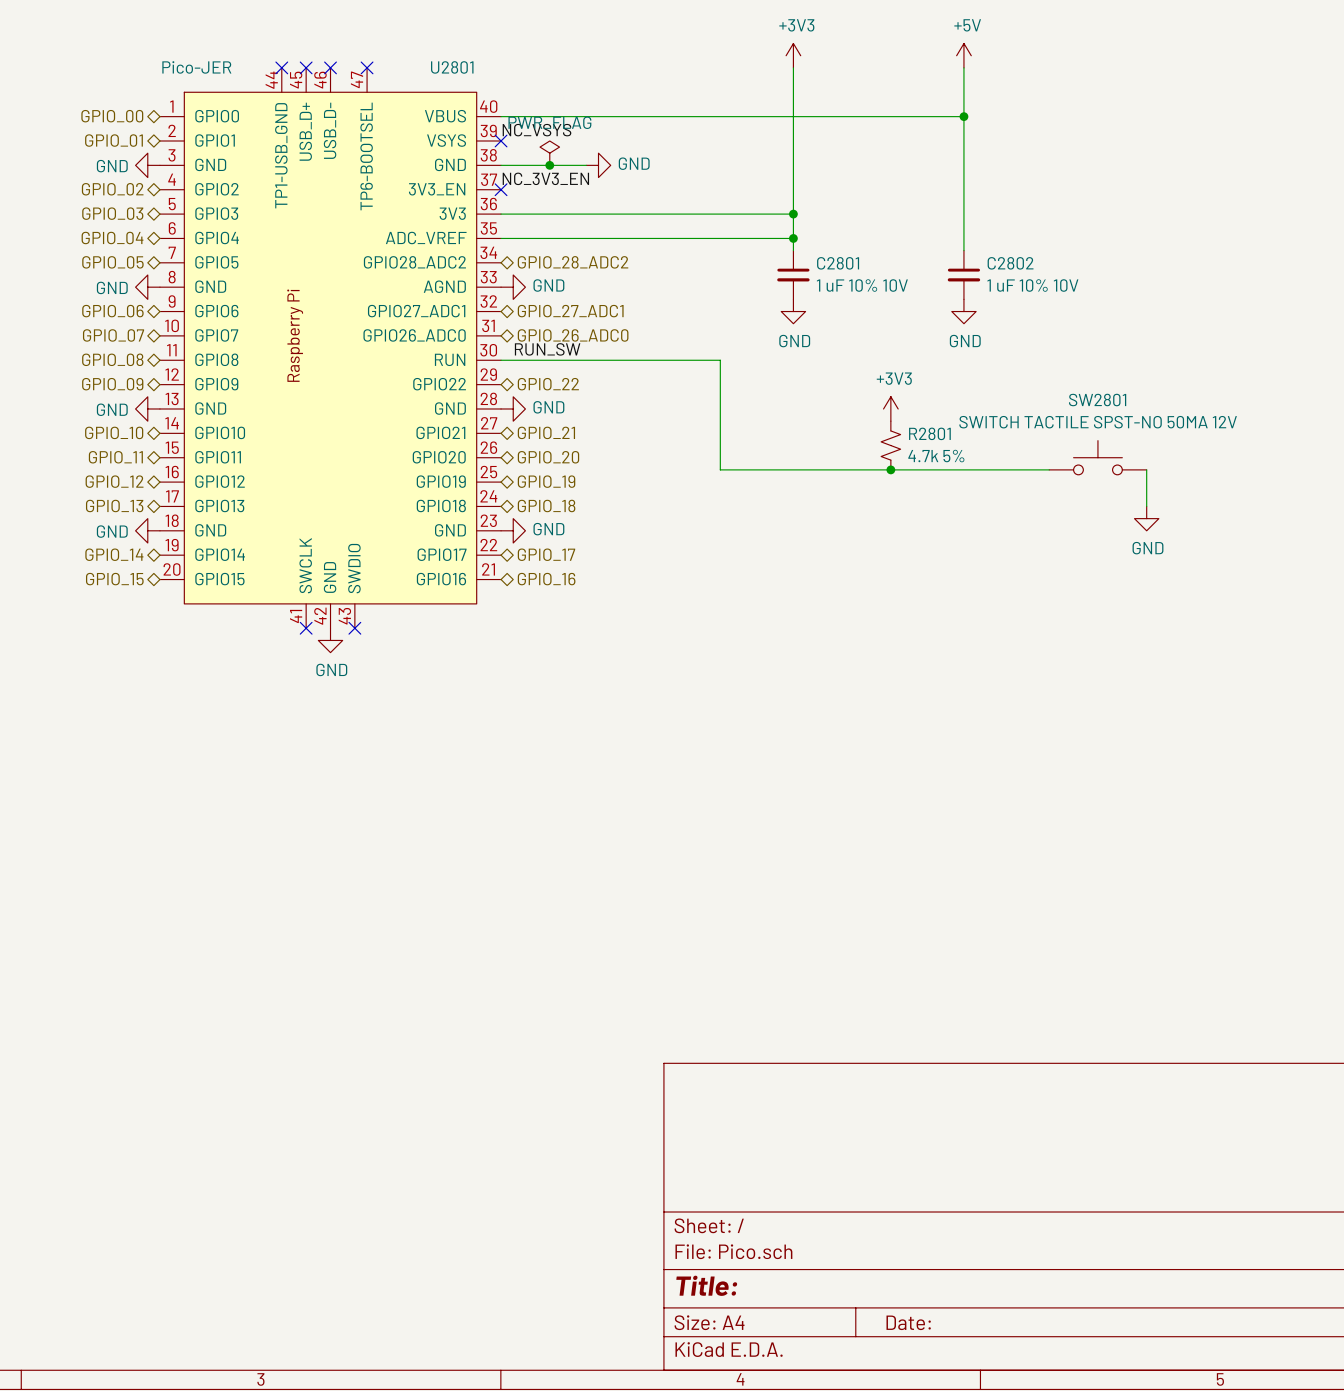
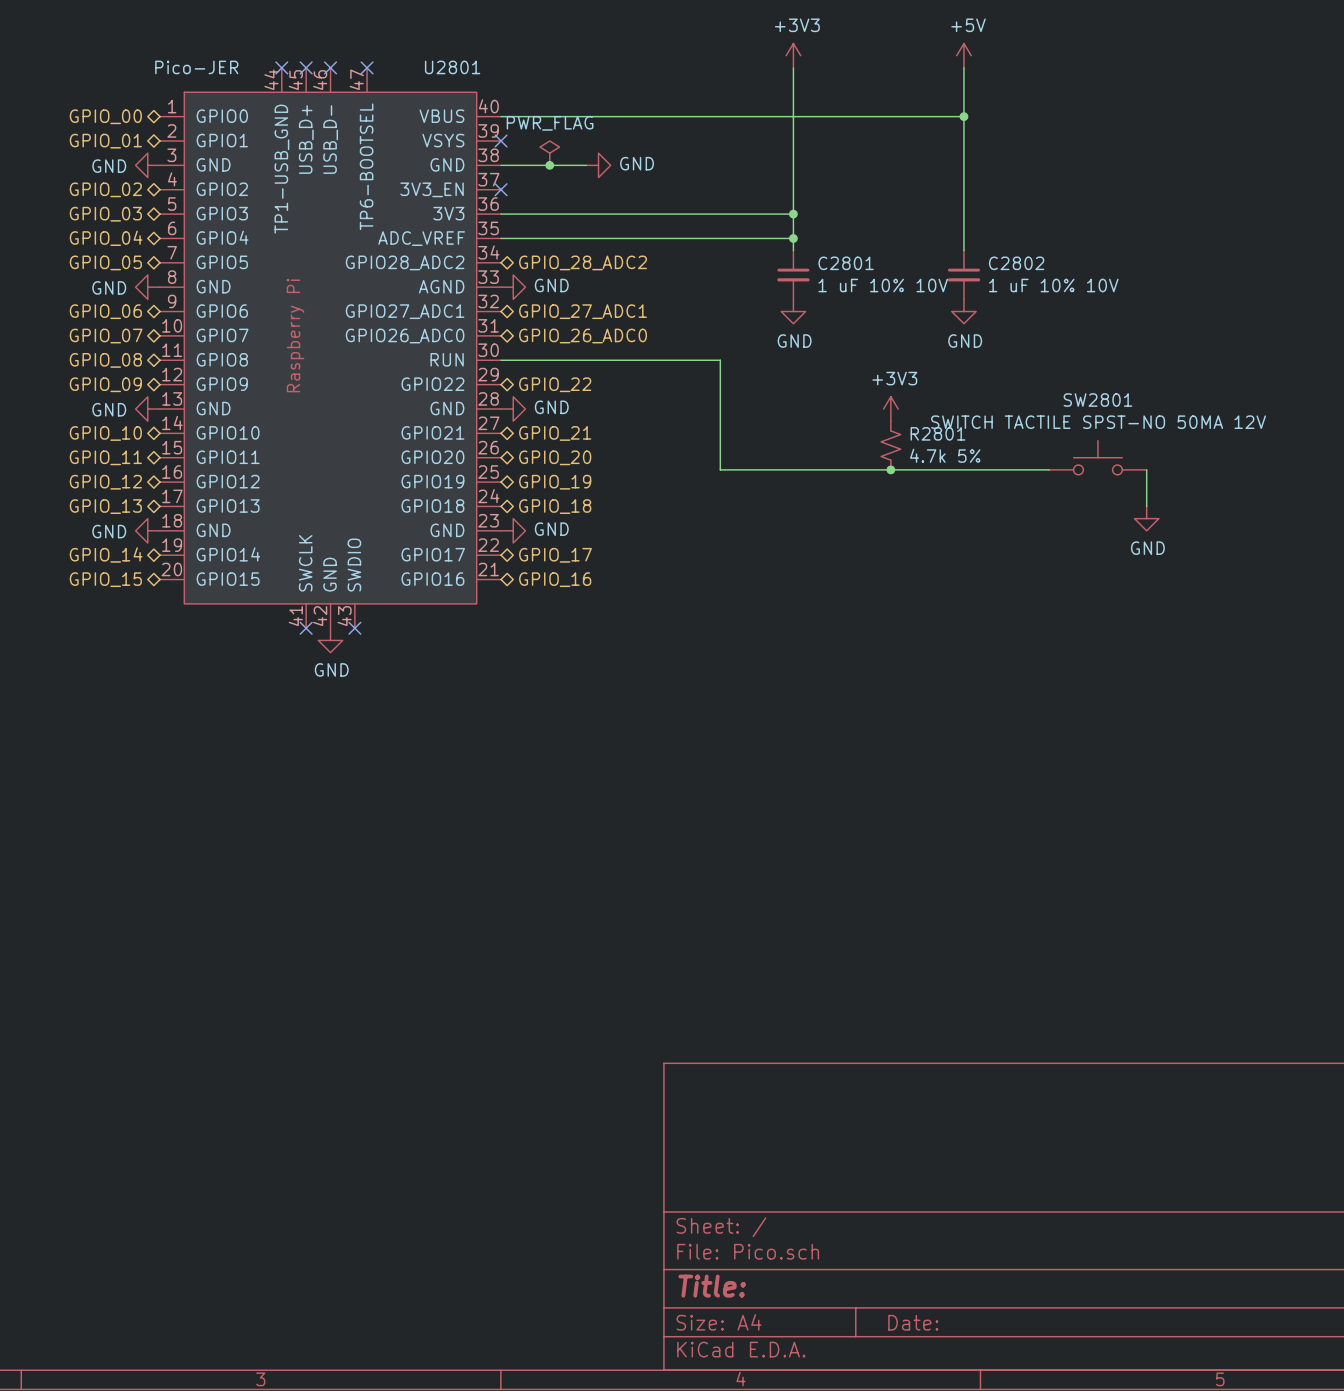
label: NC_VSYS (537, 130) -> none
label: NC_3V3_EN (545, 178) -> none
label: RUN_SW (547, 349) -> none

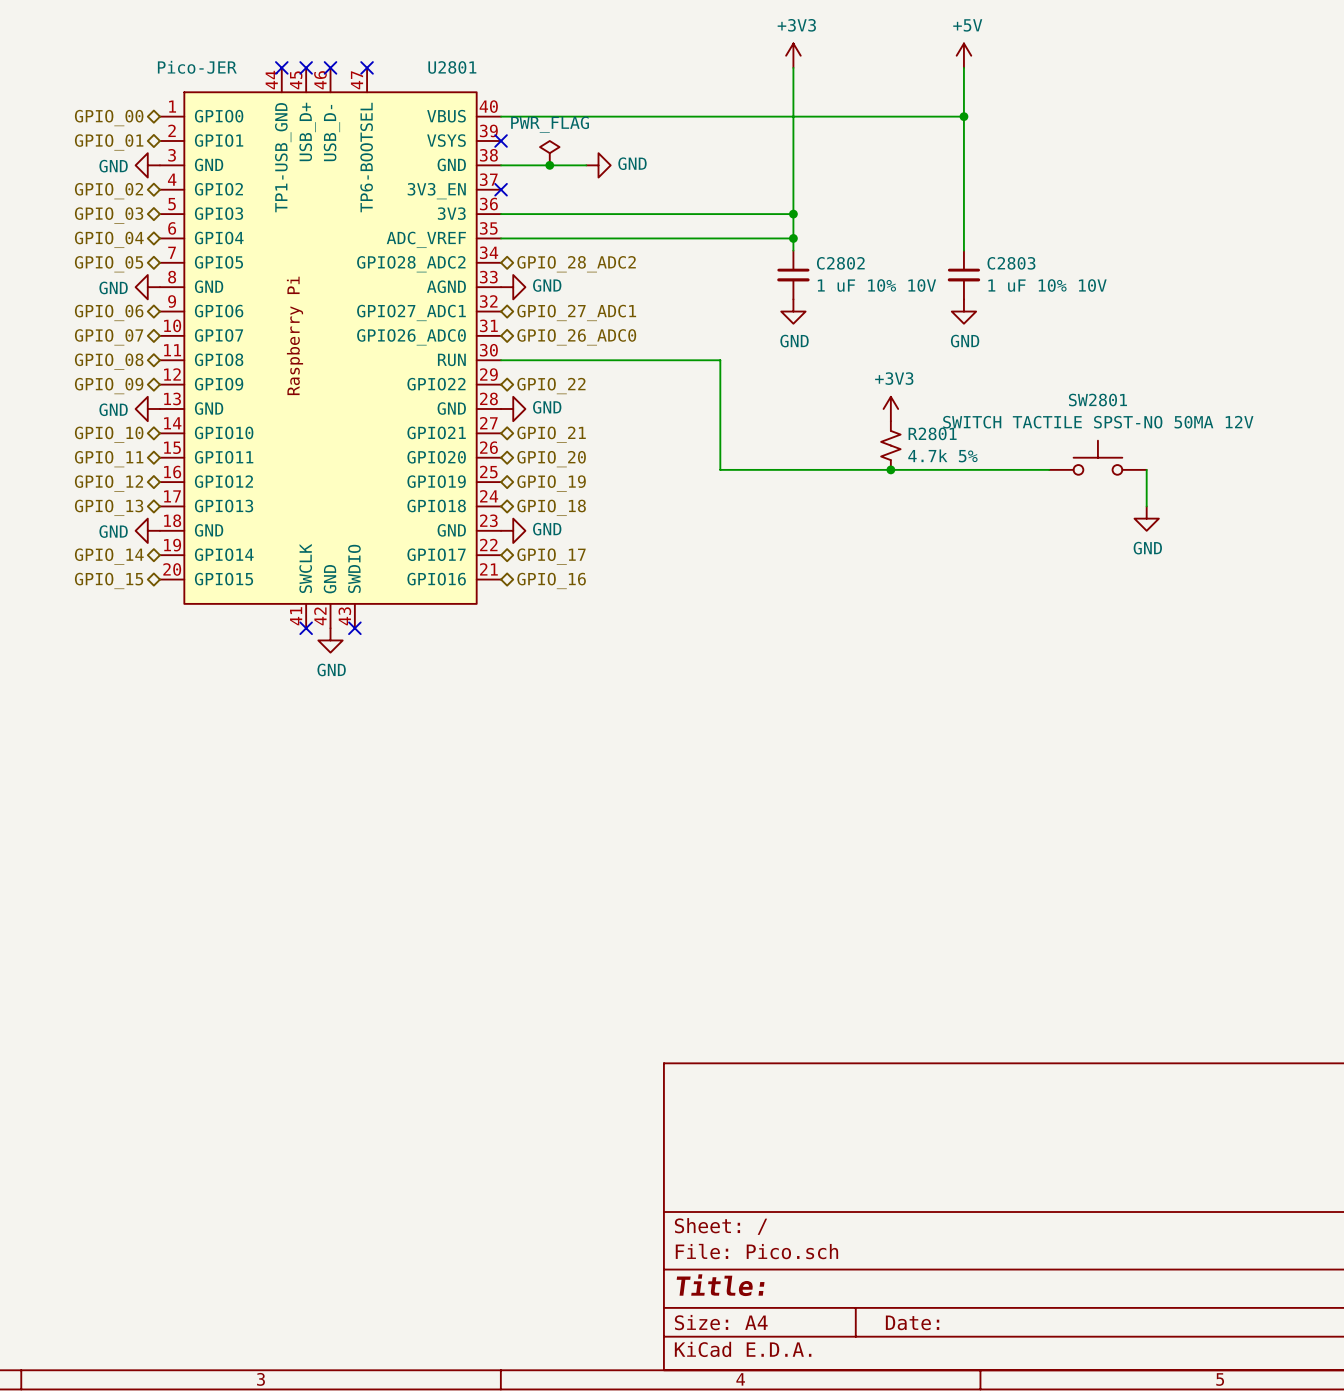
C2801 name: C2801 (846, 263) -> C2802 (840, 263)
C2802 name: C2802 (1016, 263) -> C2803 (1011, 263)

